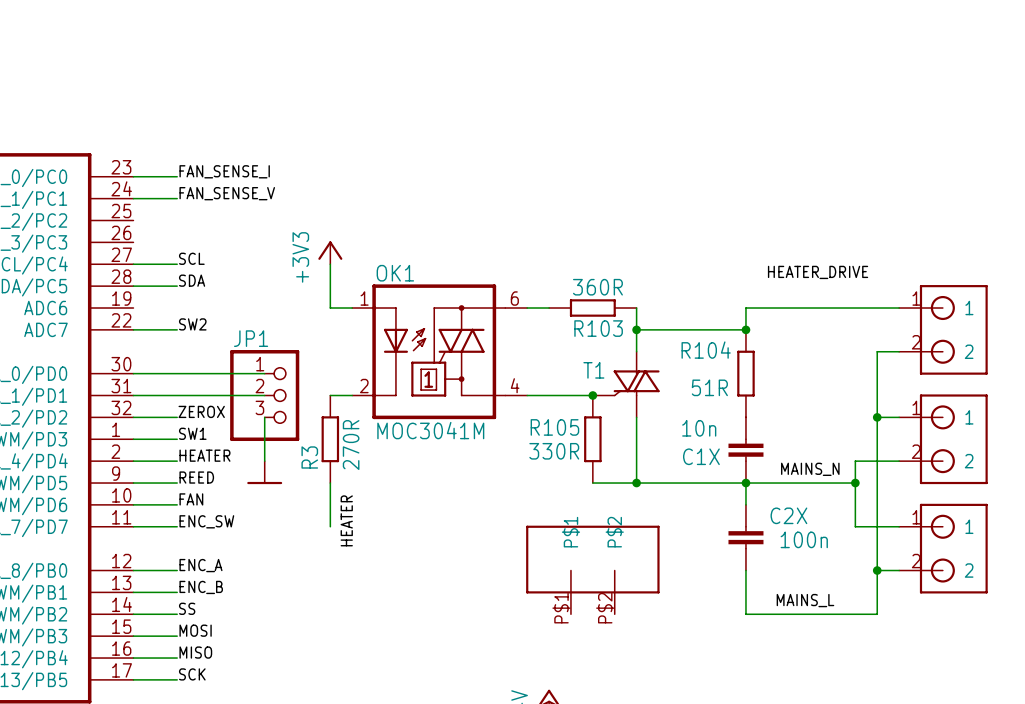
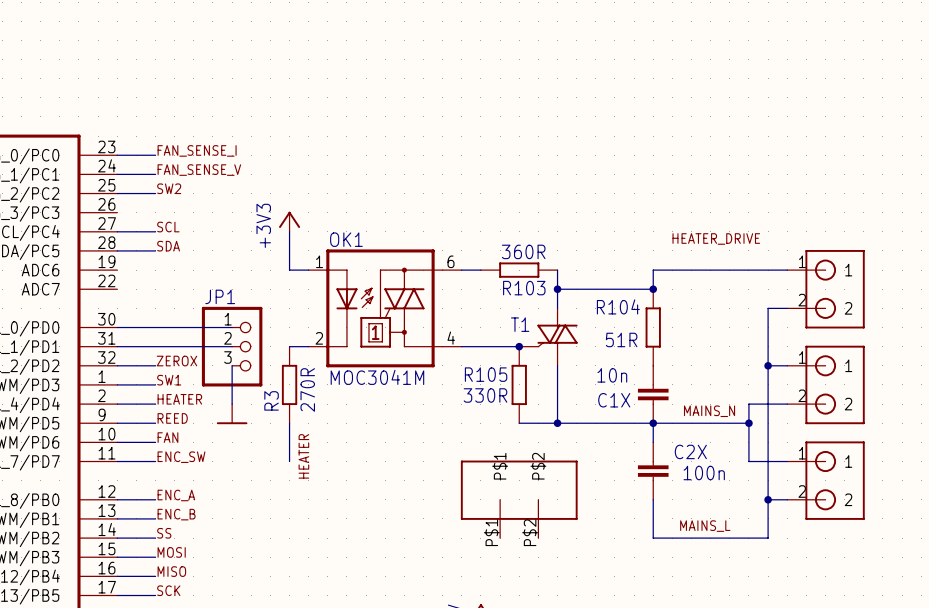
label position: SW2 (192, 324) -> SW2 (169, 188)
wire: (133, 329) (177, 329) -> (117, 193) (155, 193)

